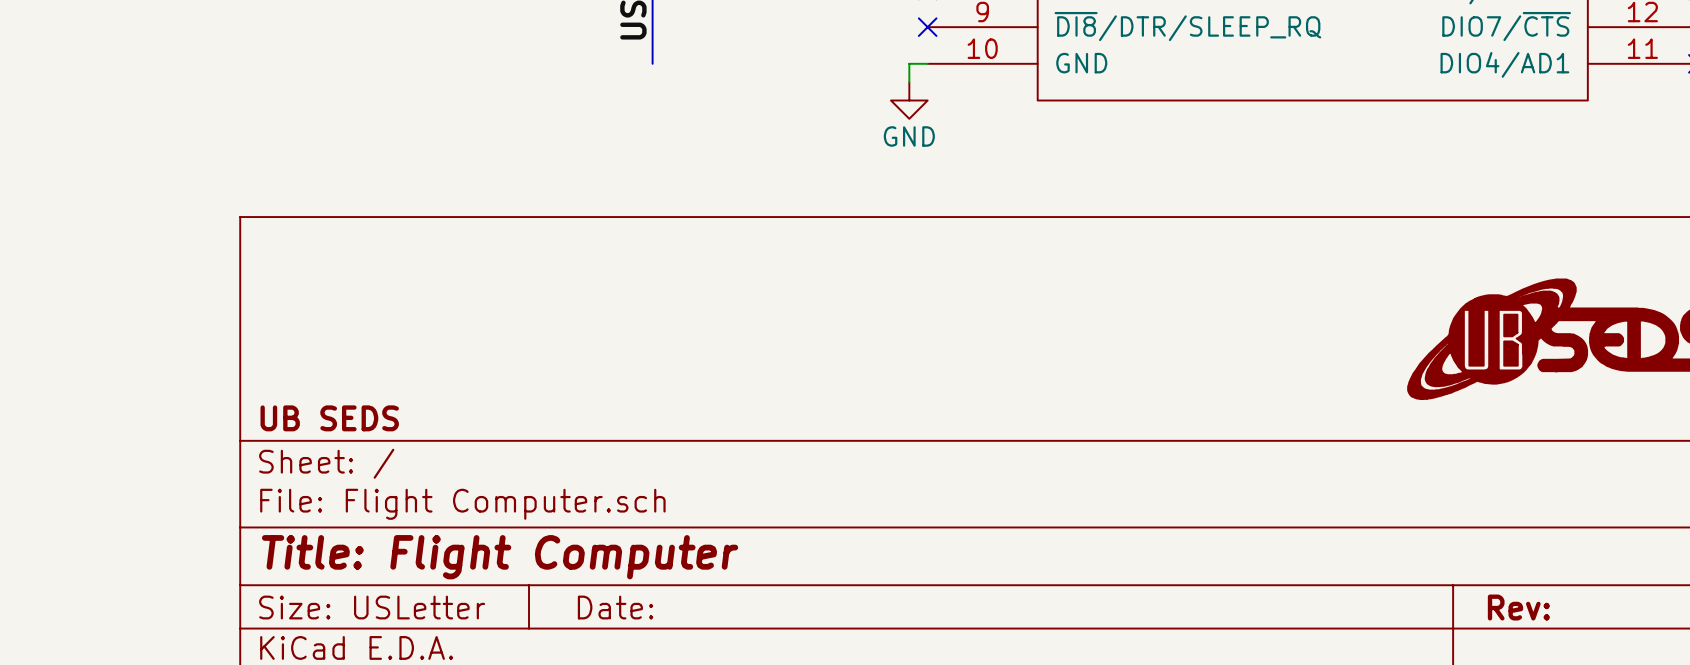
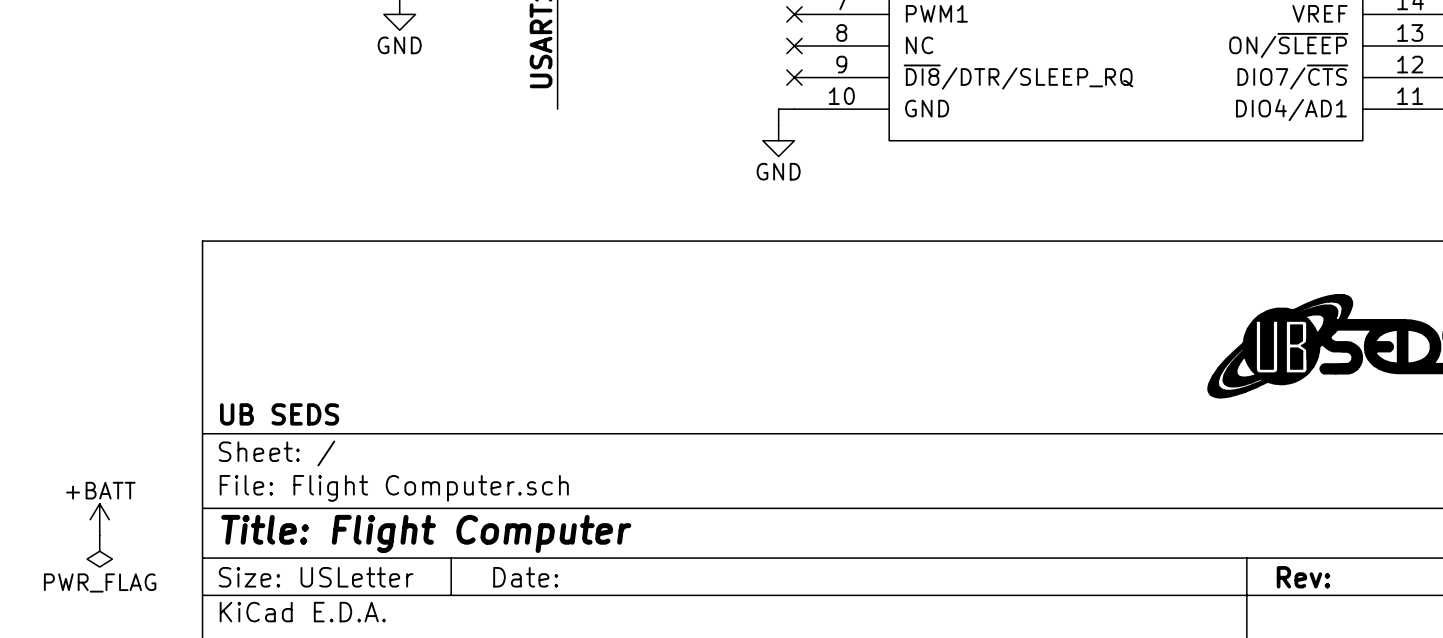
power symbol: none -> +BATT (99, 519)
power symbol: none -> PWR_FLAG (99, 551)

